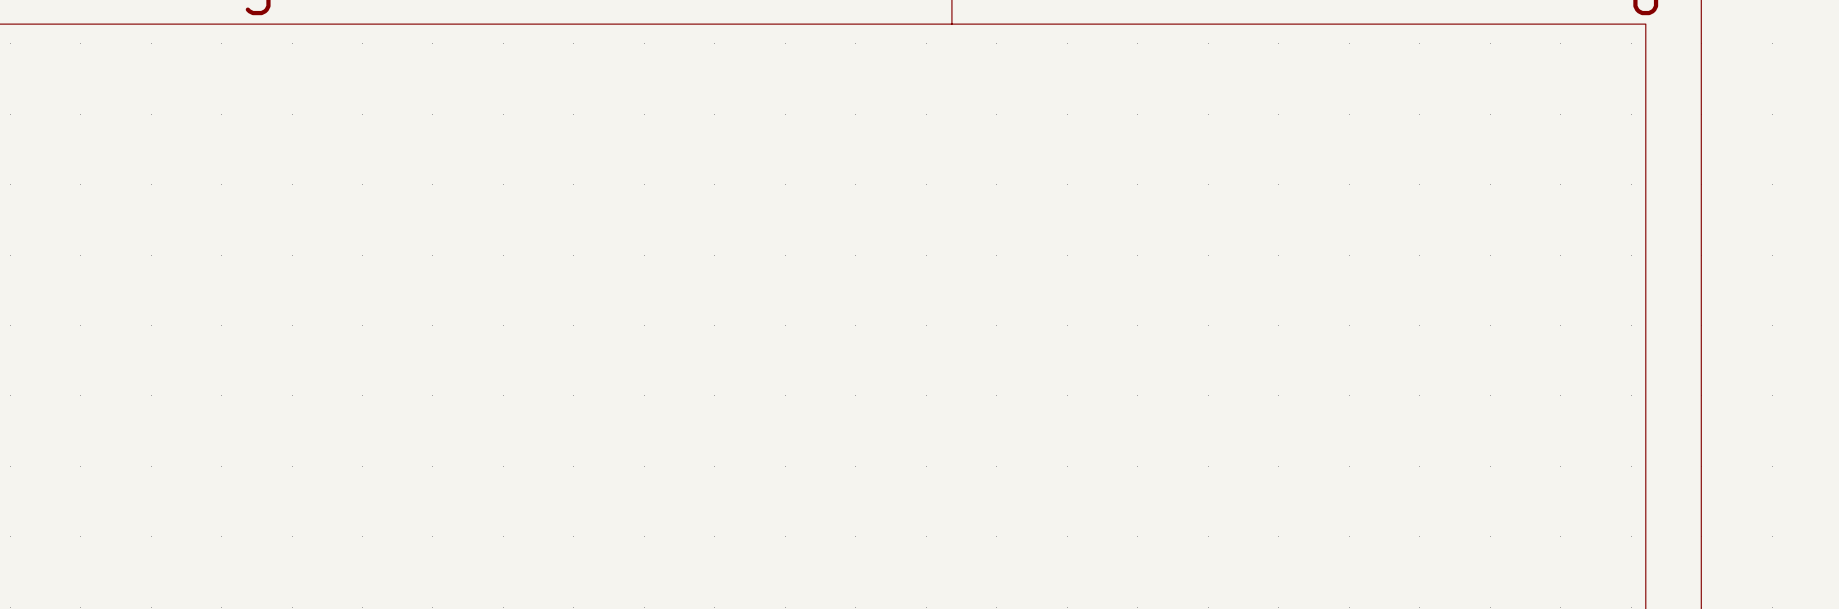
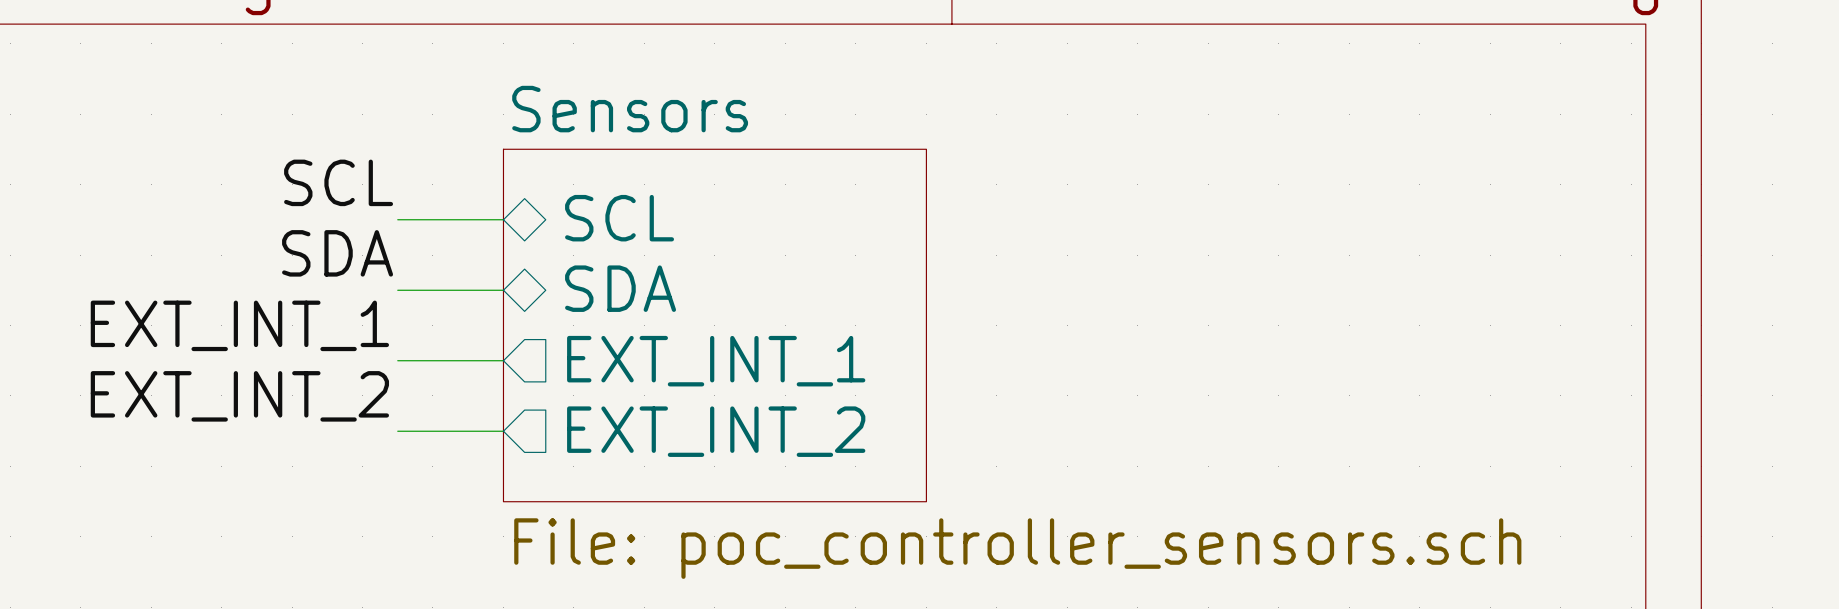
label: none -> SCL (338, 182)
sheet pin: none -> SCL (619, 218)
wire: none -> (397, 219) (503, 219)
label: none -> SDA (337, 253)
sheet pin: none -> SDA (620, 288)
wire: none -> (397, 290) (503, 290)
label: none -> EXT_INT_1 (239, 325)
sheet Sensors: none -> File: poc_controller_sensors.sch (714, 325)
wire: none -> (397, 360) (503, 360)
sheet pin: none -> EXT_INT_1 (716, 361)
label: none -> EXT_INT_2 (239, 396)
wire: none -> (397, 431) (503, 431)
sheet pin: none -> EXT_INT_2 (716, 431)

